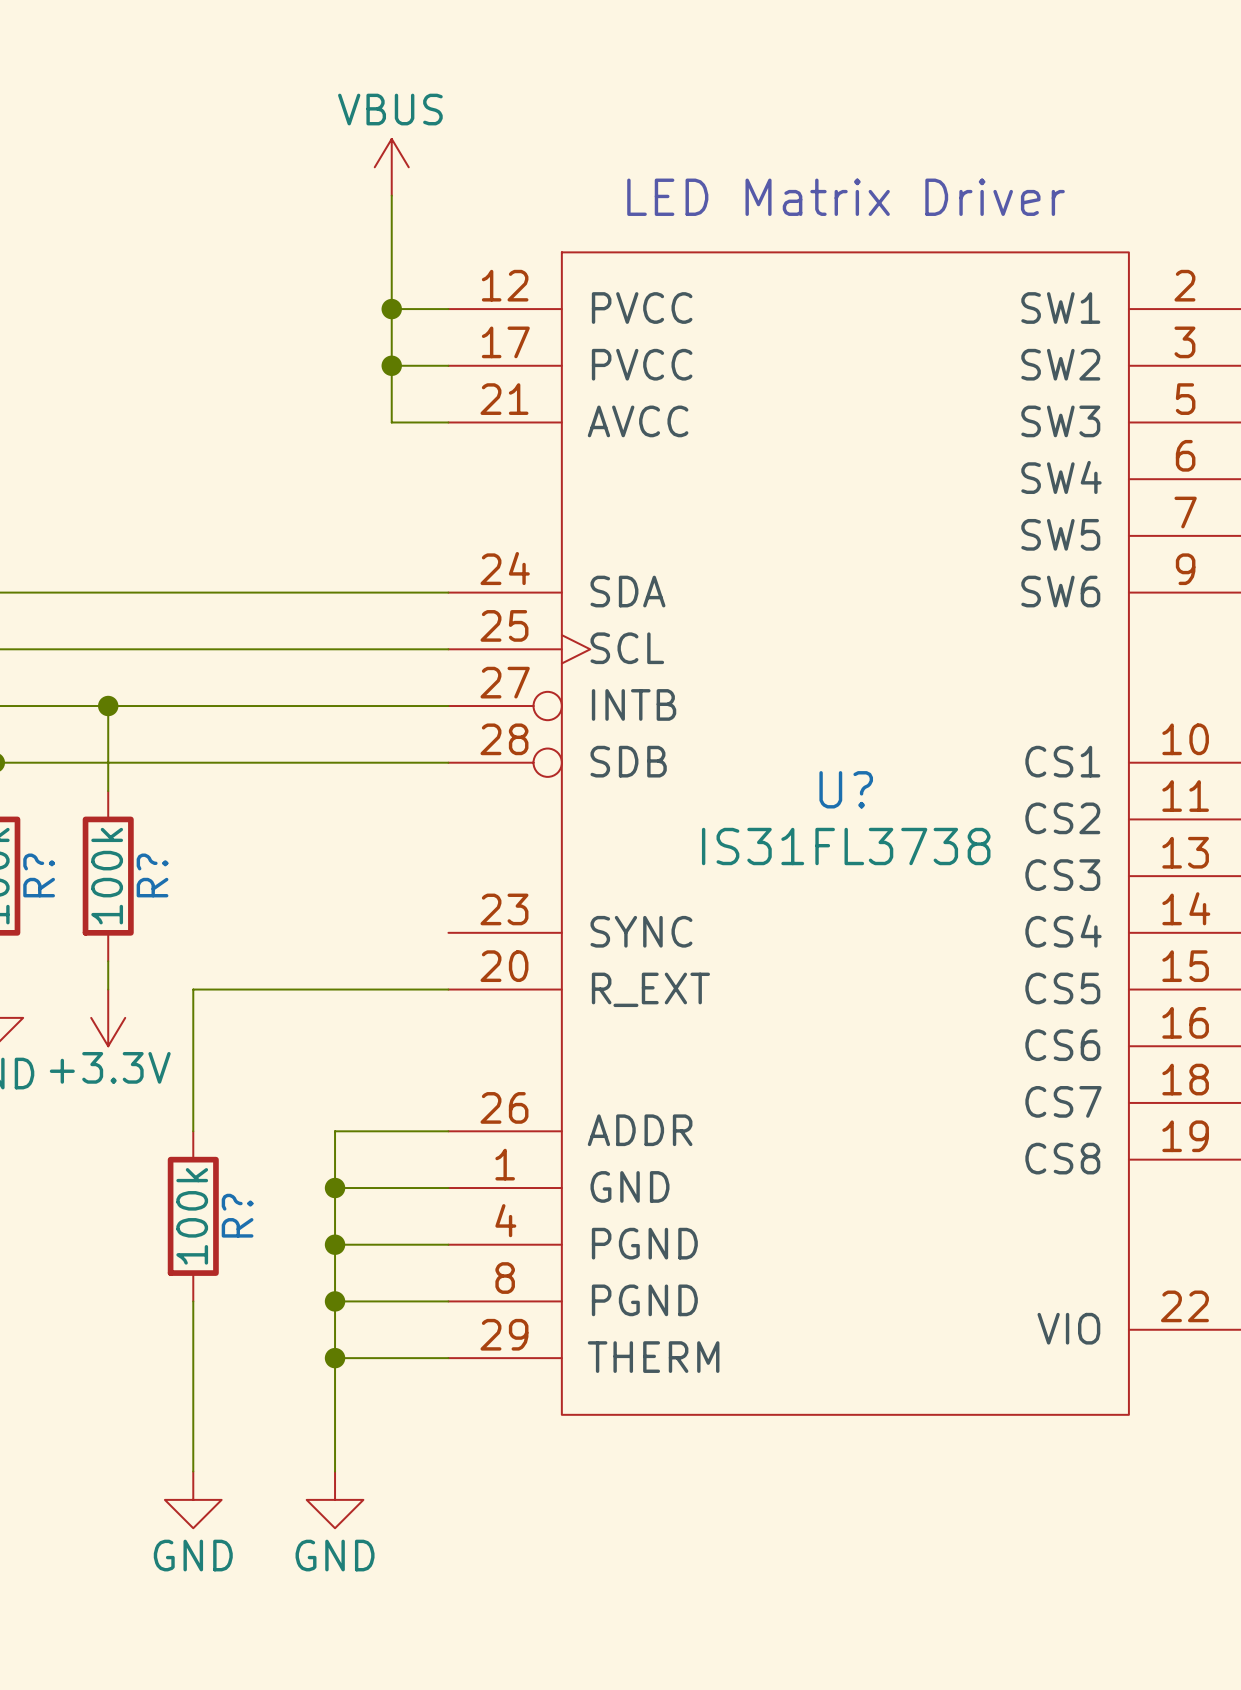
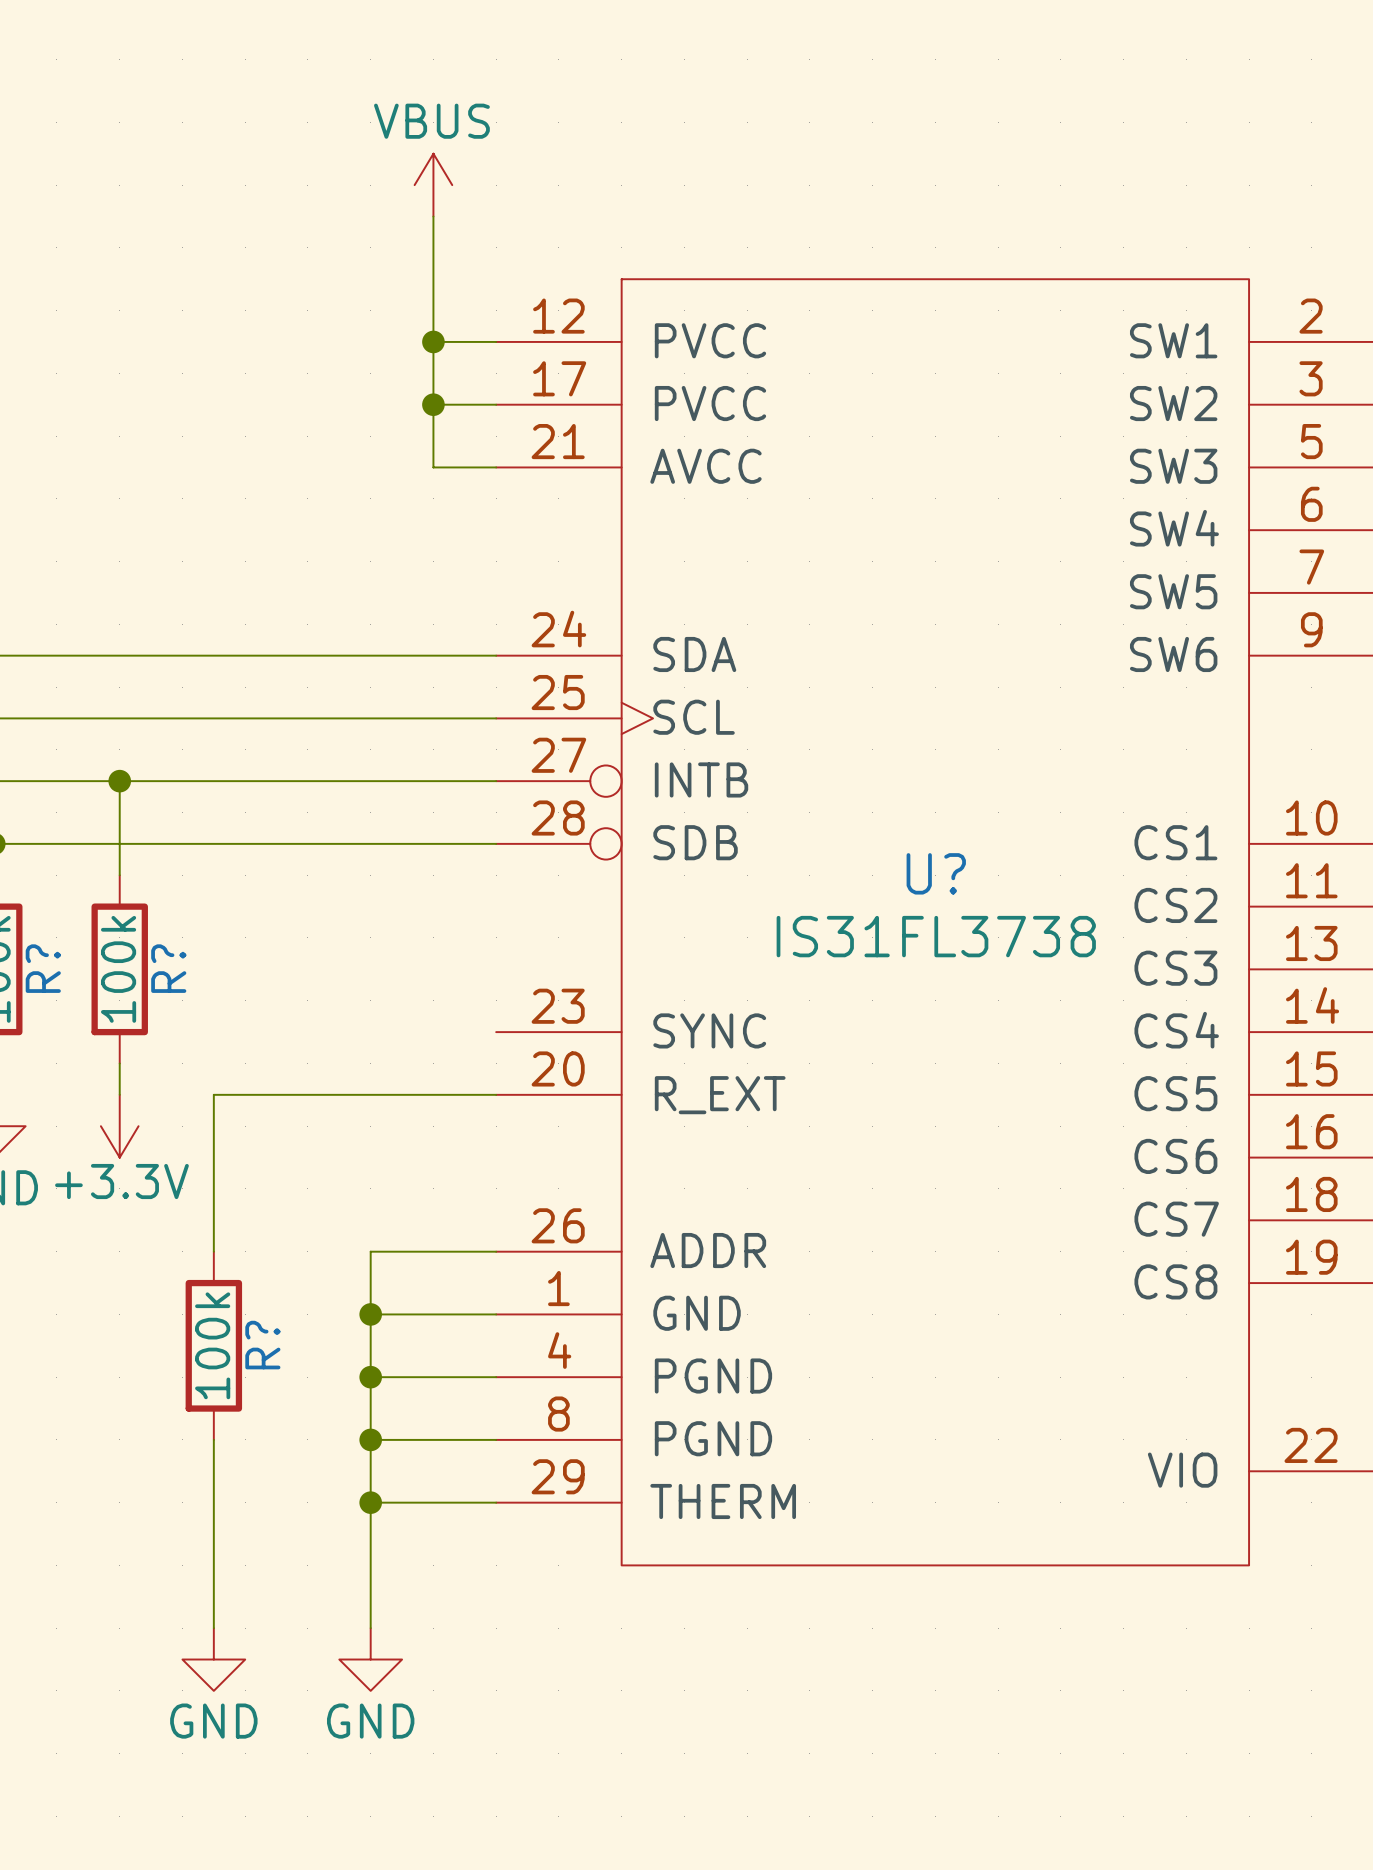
text: LED Matrix Driver (846, 197) -> none

